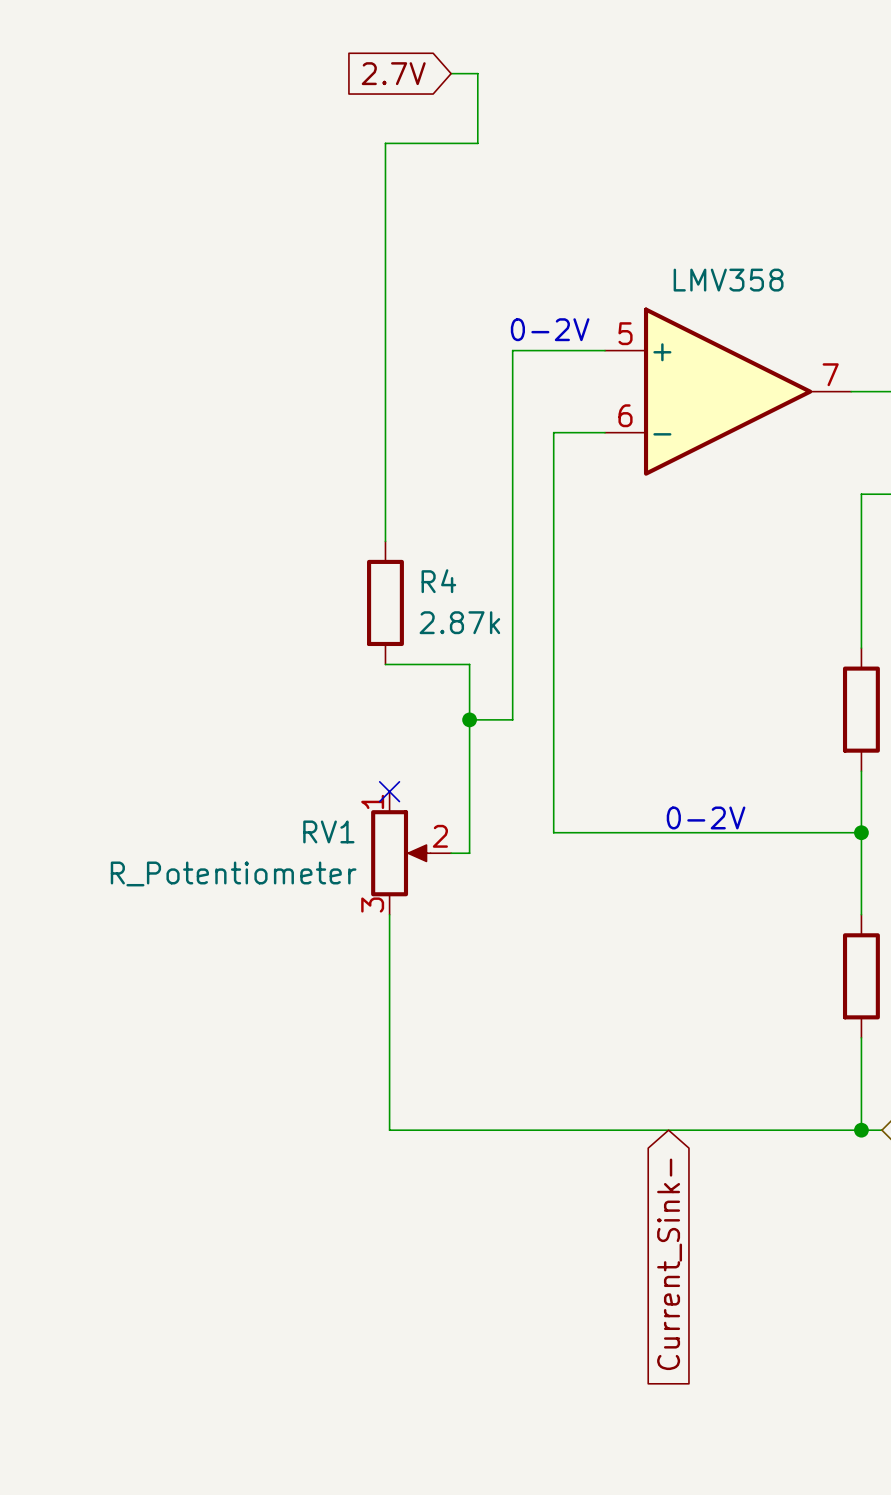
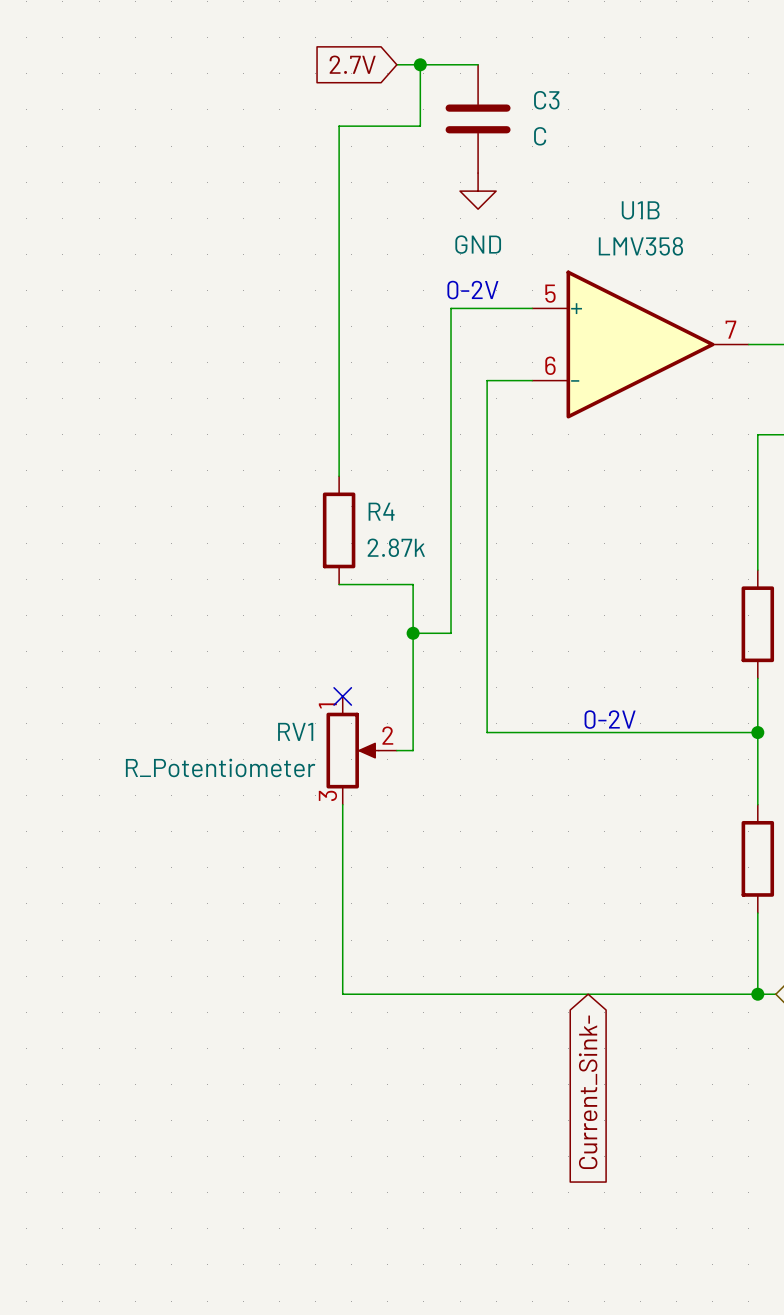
wire: none -> (420, 64) (478, 64)
junction: none -> (420, 64)
C3: none -> C (478, 118)
power symbol: none -> GND (478, 191)
U1B name: none -> U1B (640, 210)

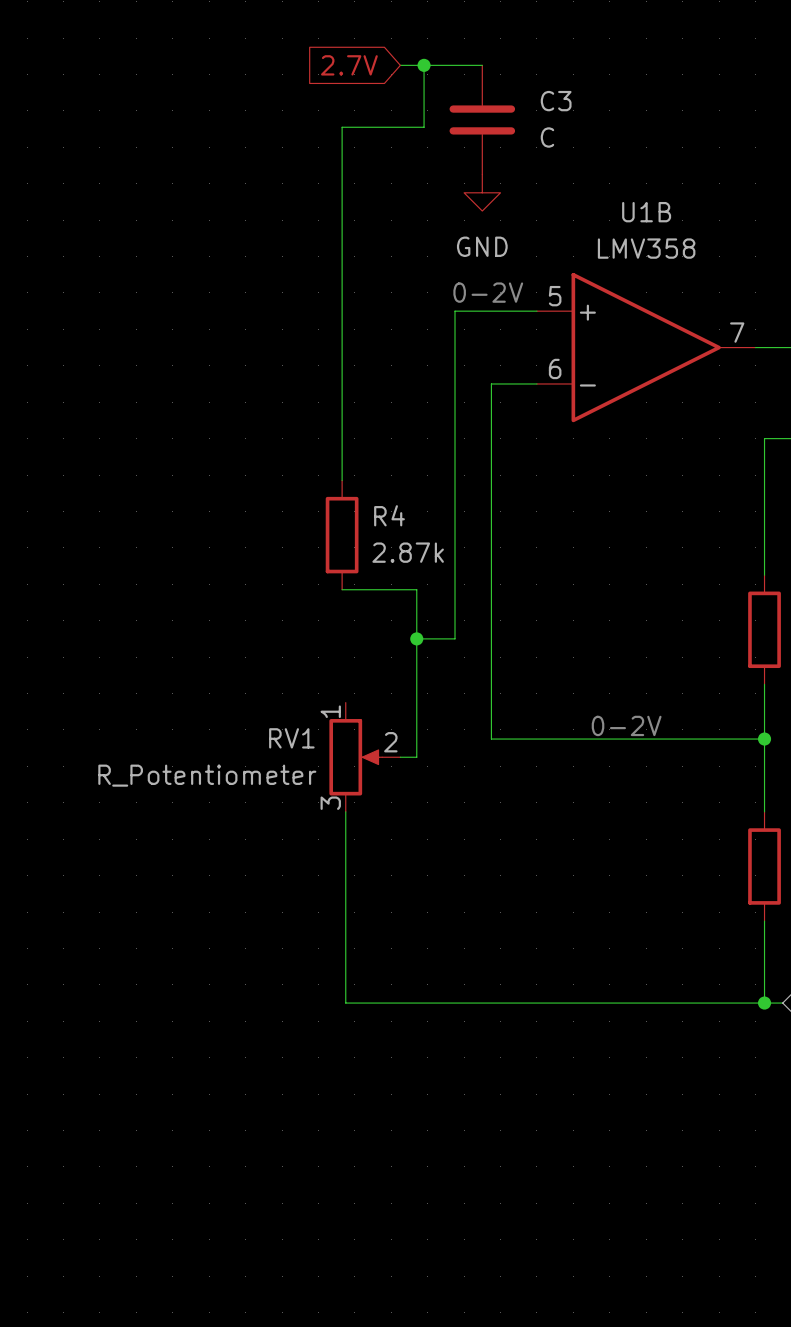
no-connect mark: (342, 696) -> none
global label: Current_Sink- (588, 1092) -> none

